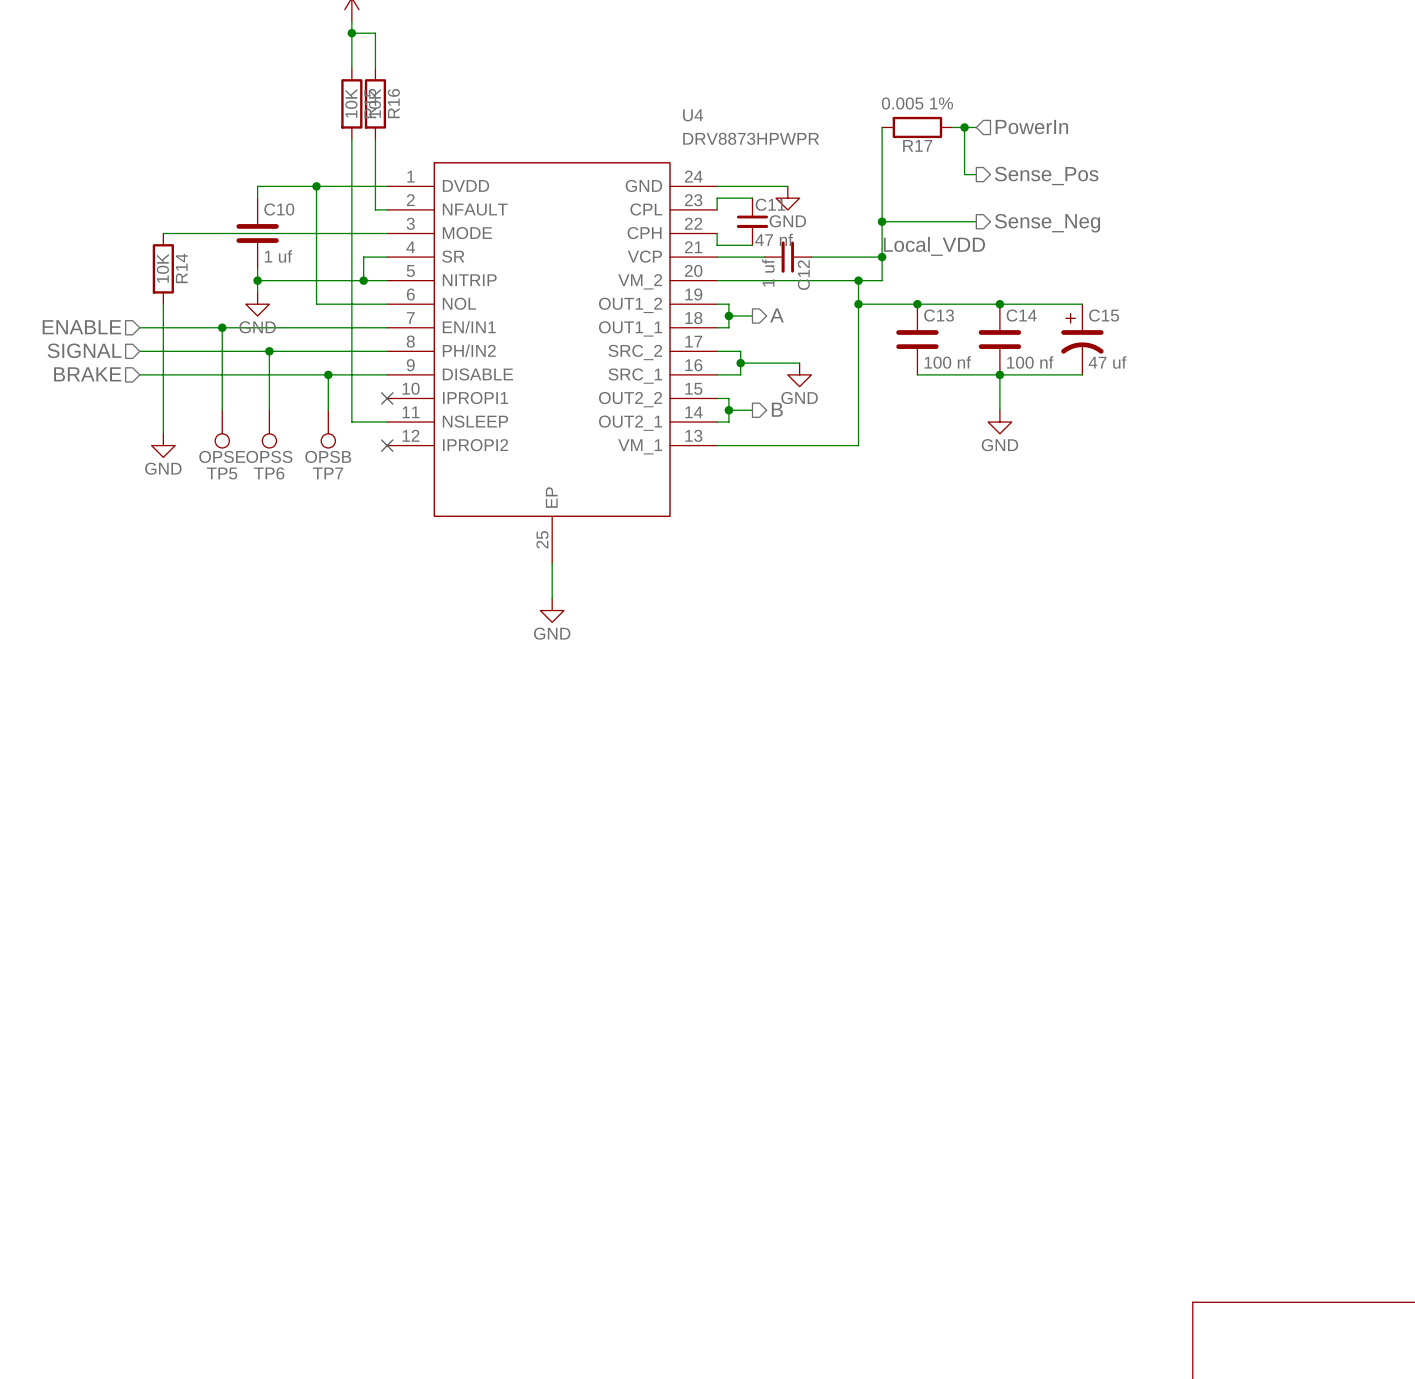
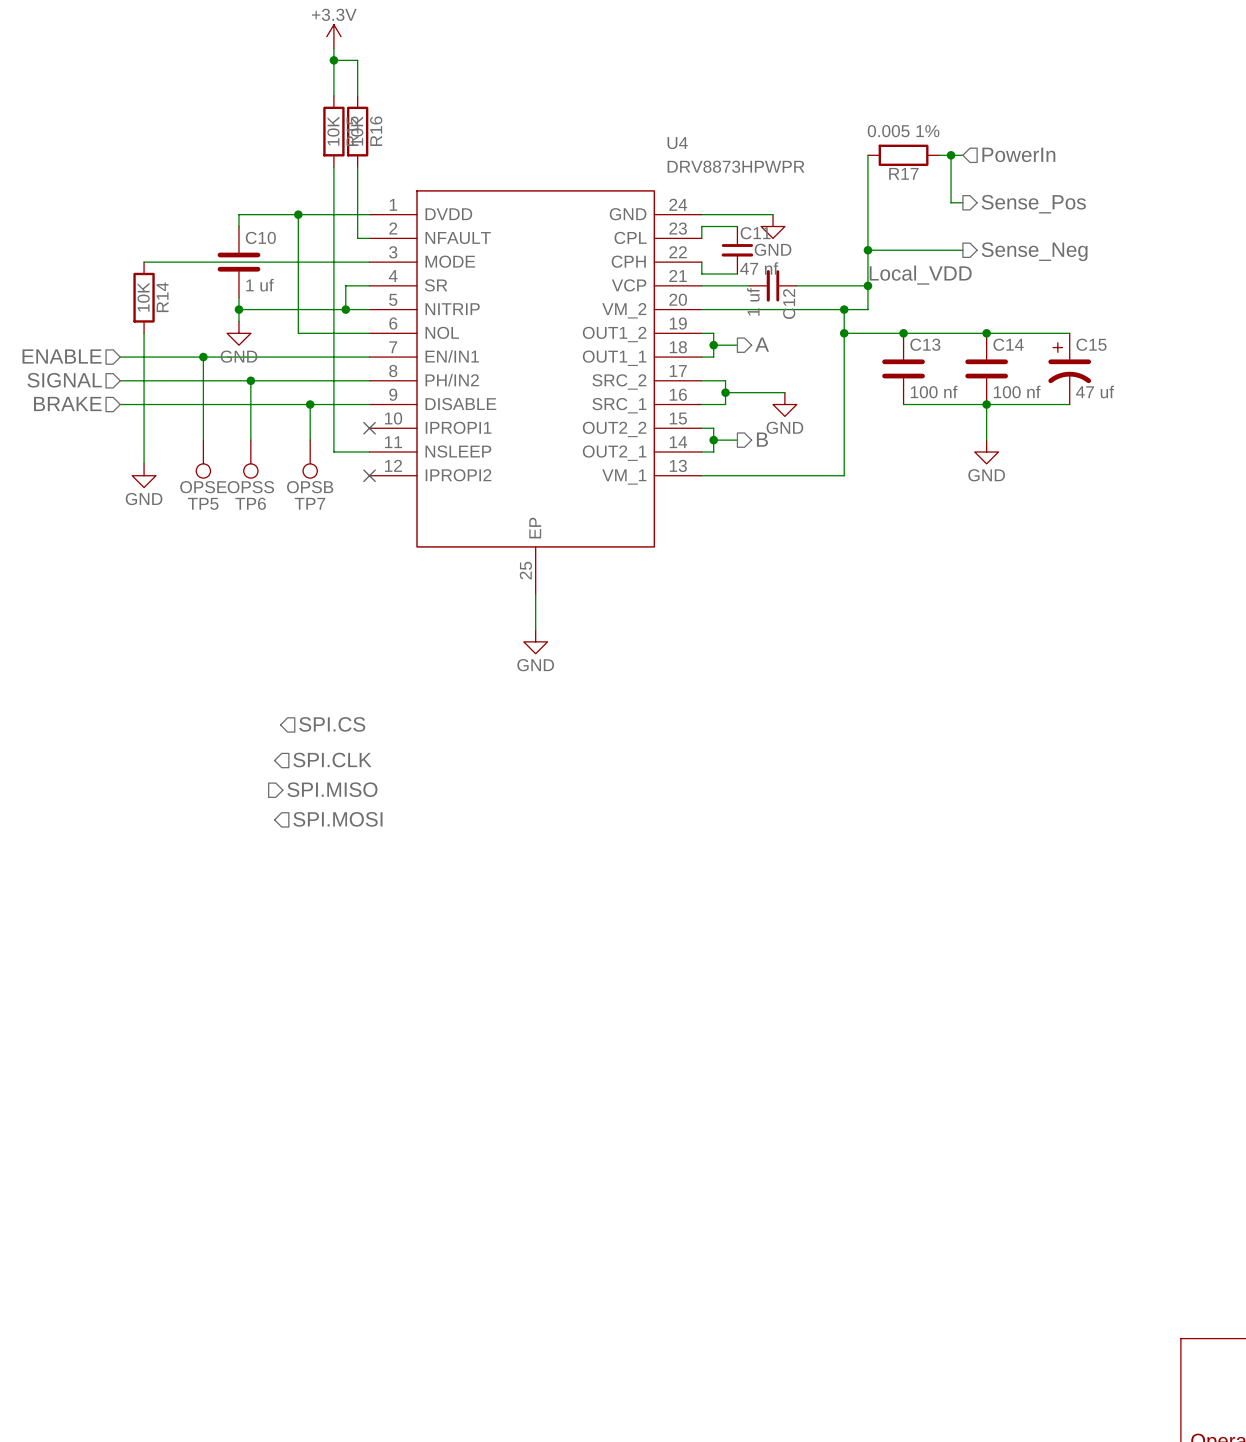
hierarchical label: none -> SPI.CS (332, 724)
hierarchical label: none -> SPI.CLK (332, 760)
hierarchical label: none -> SPI.MISO (332, 789)
hierarchical label: none -> SPI.MOSI (337, 819)

